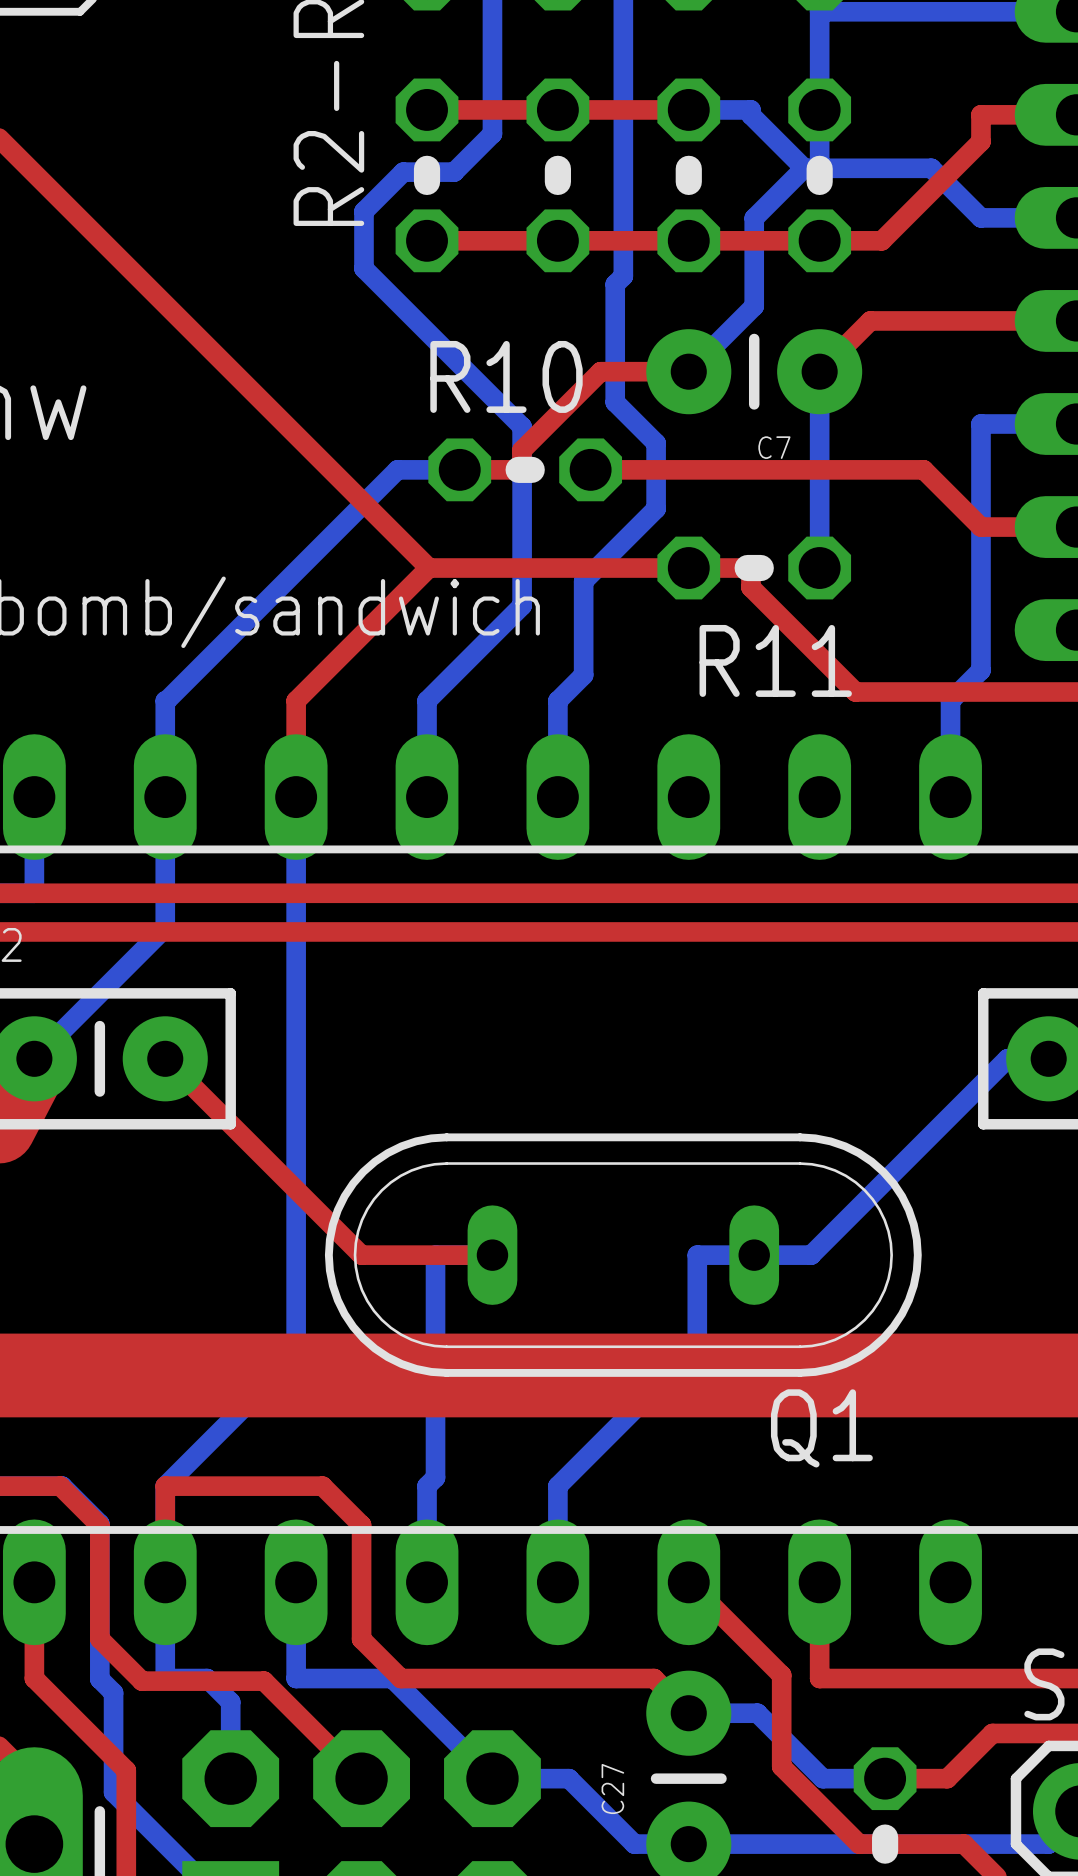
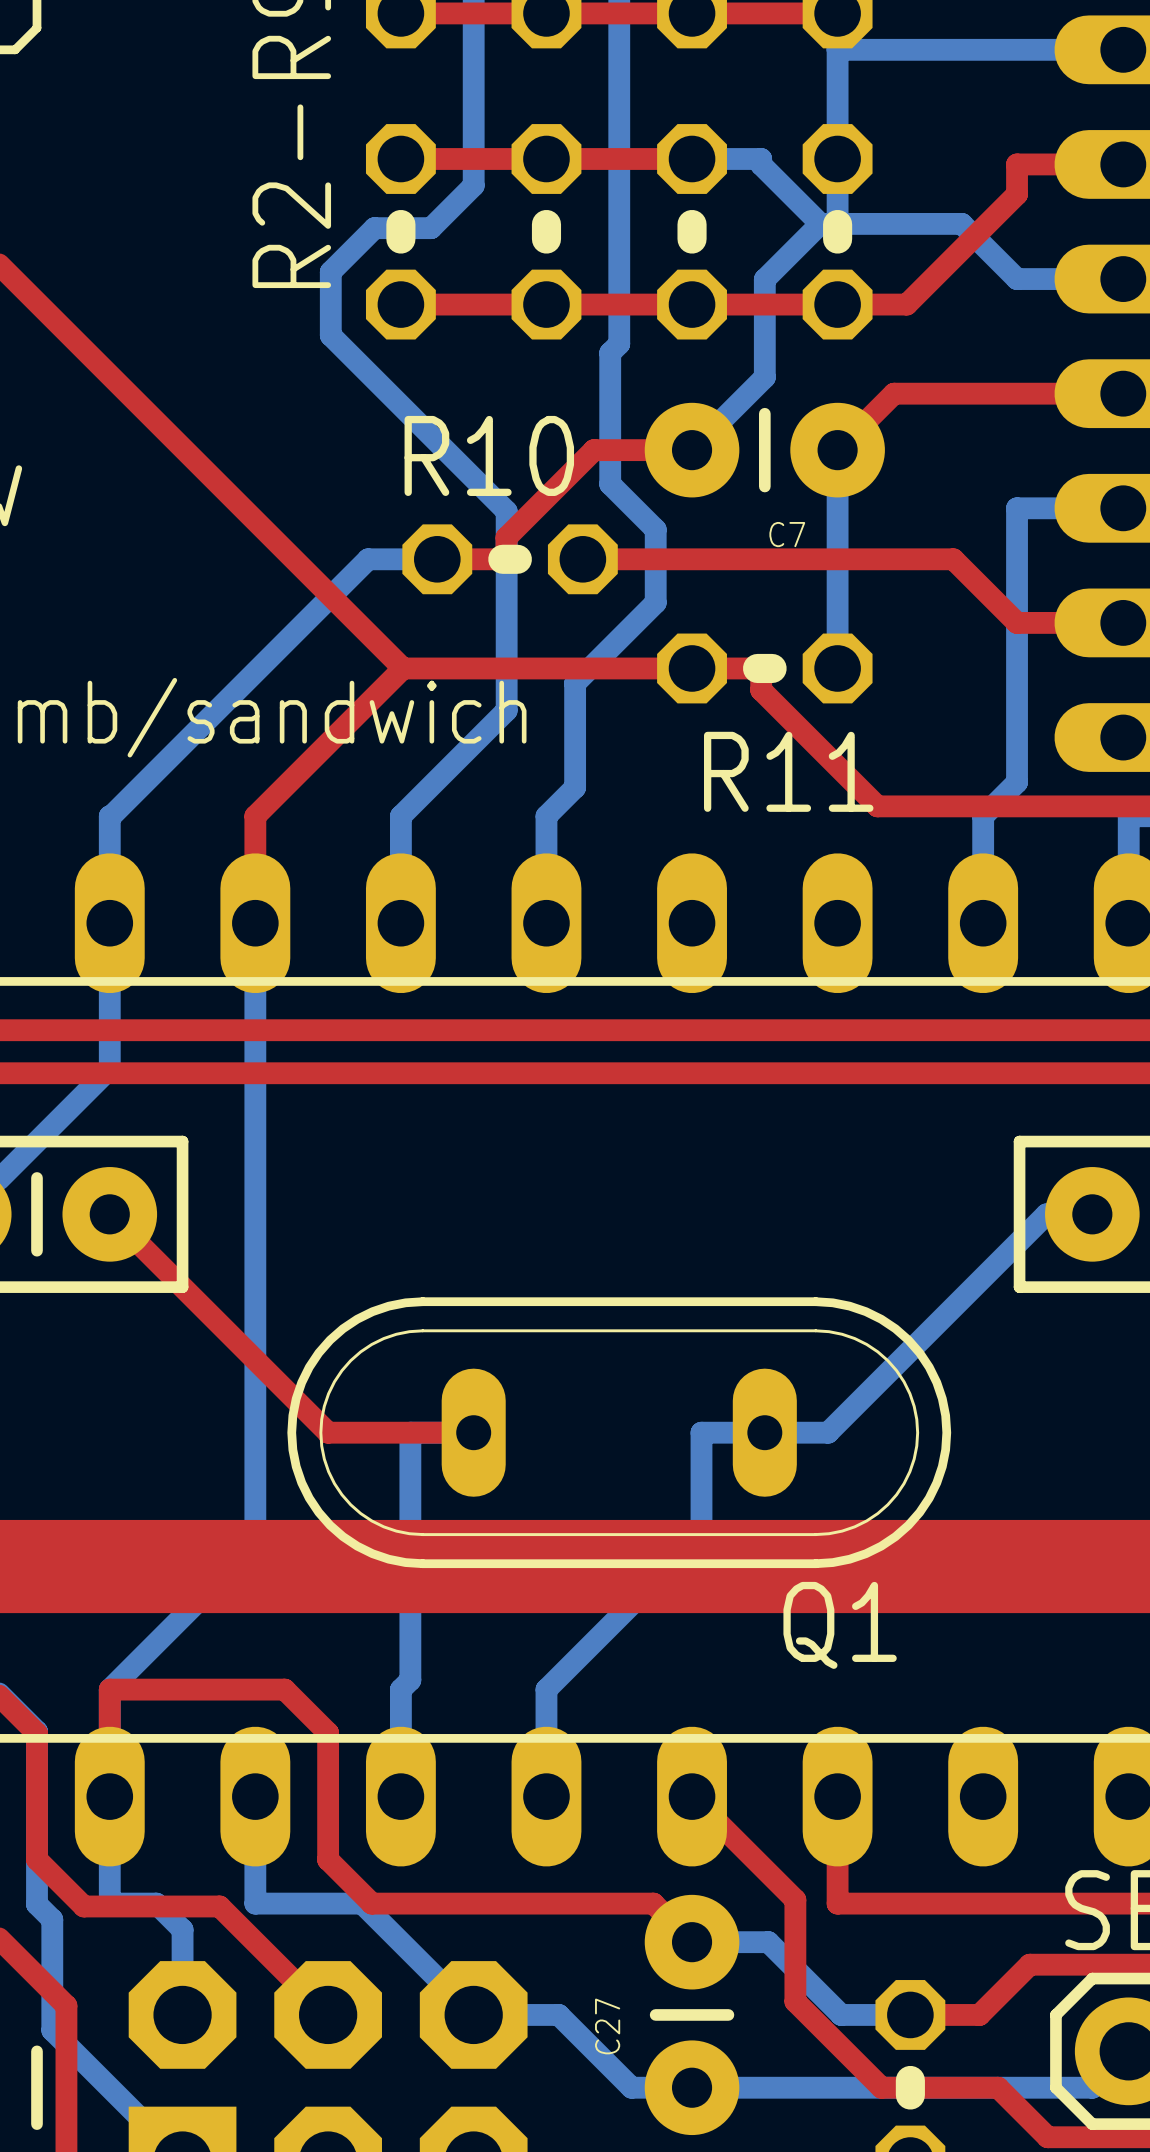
Q1 footprint: [324, 1133, 922, 1377] -> [287, 1297, 952, 1569]

